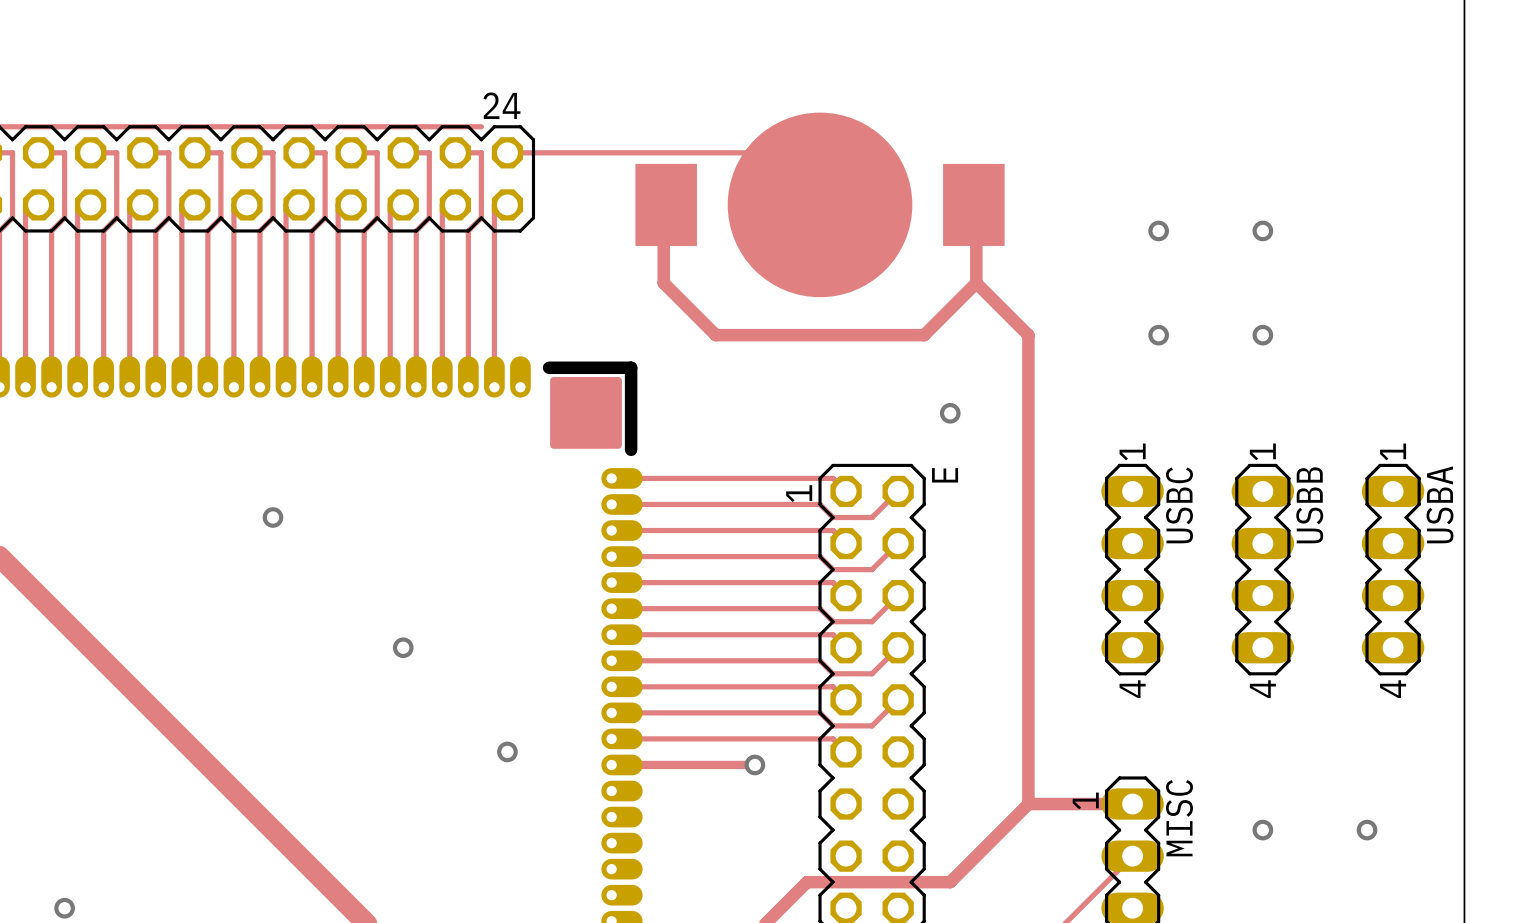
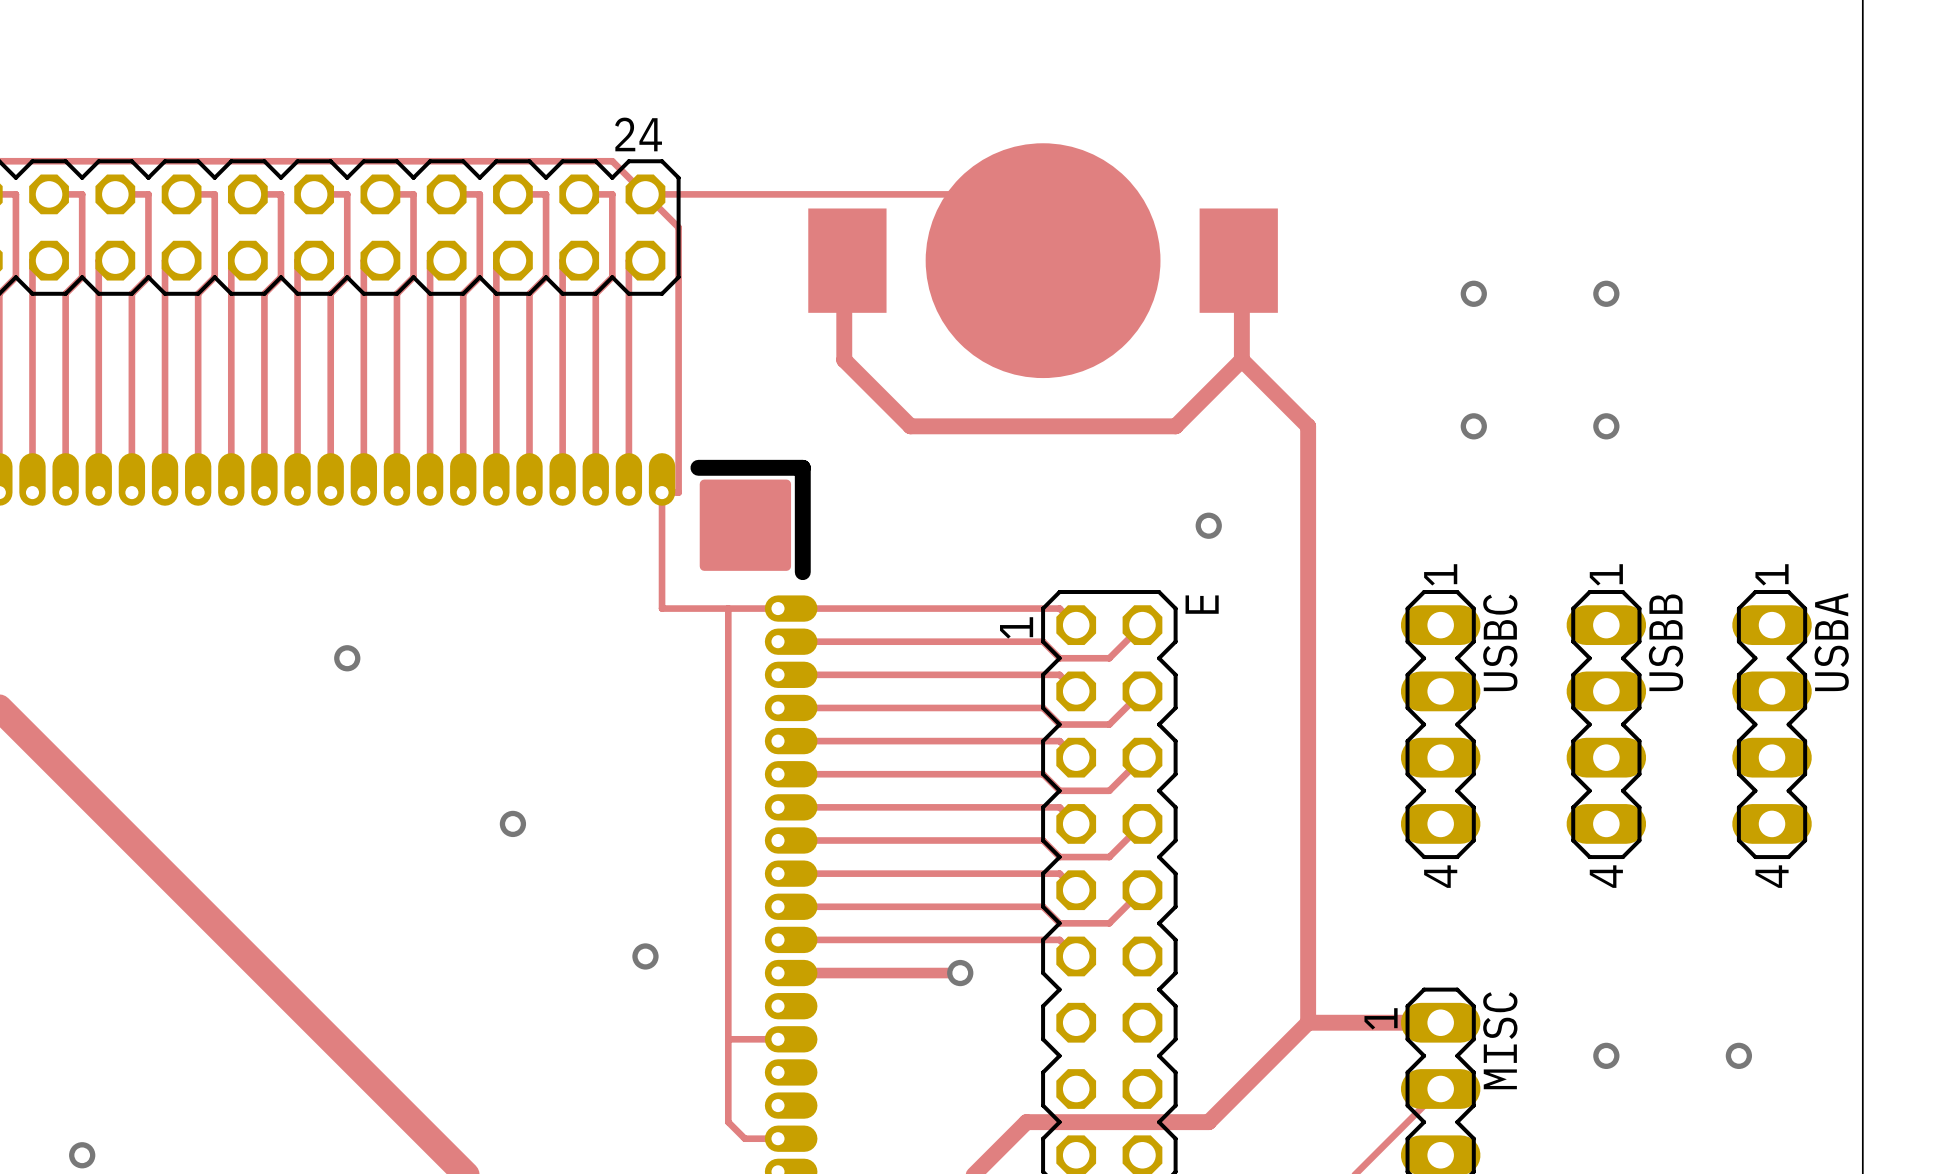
track: none -> (612, 161) (678, 227) (678, 492) (662, 492) (662, 608) (778, 608)
track: none -> (728, 608) (728, 1122) (744, 1138) (778, 1138)
track: none -> (728, 1039) (778, 1039)

